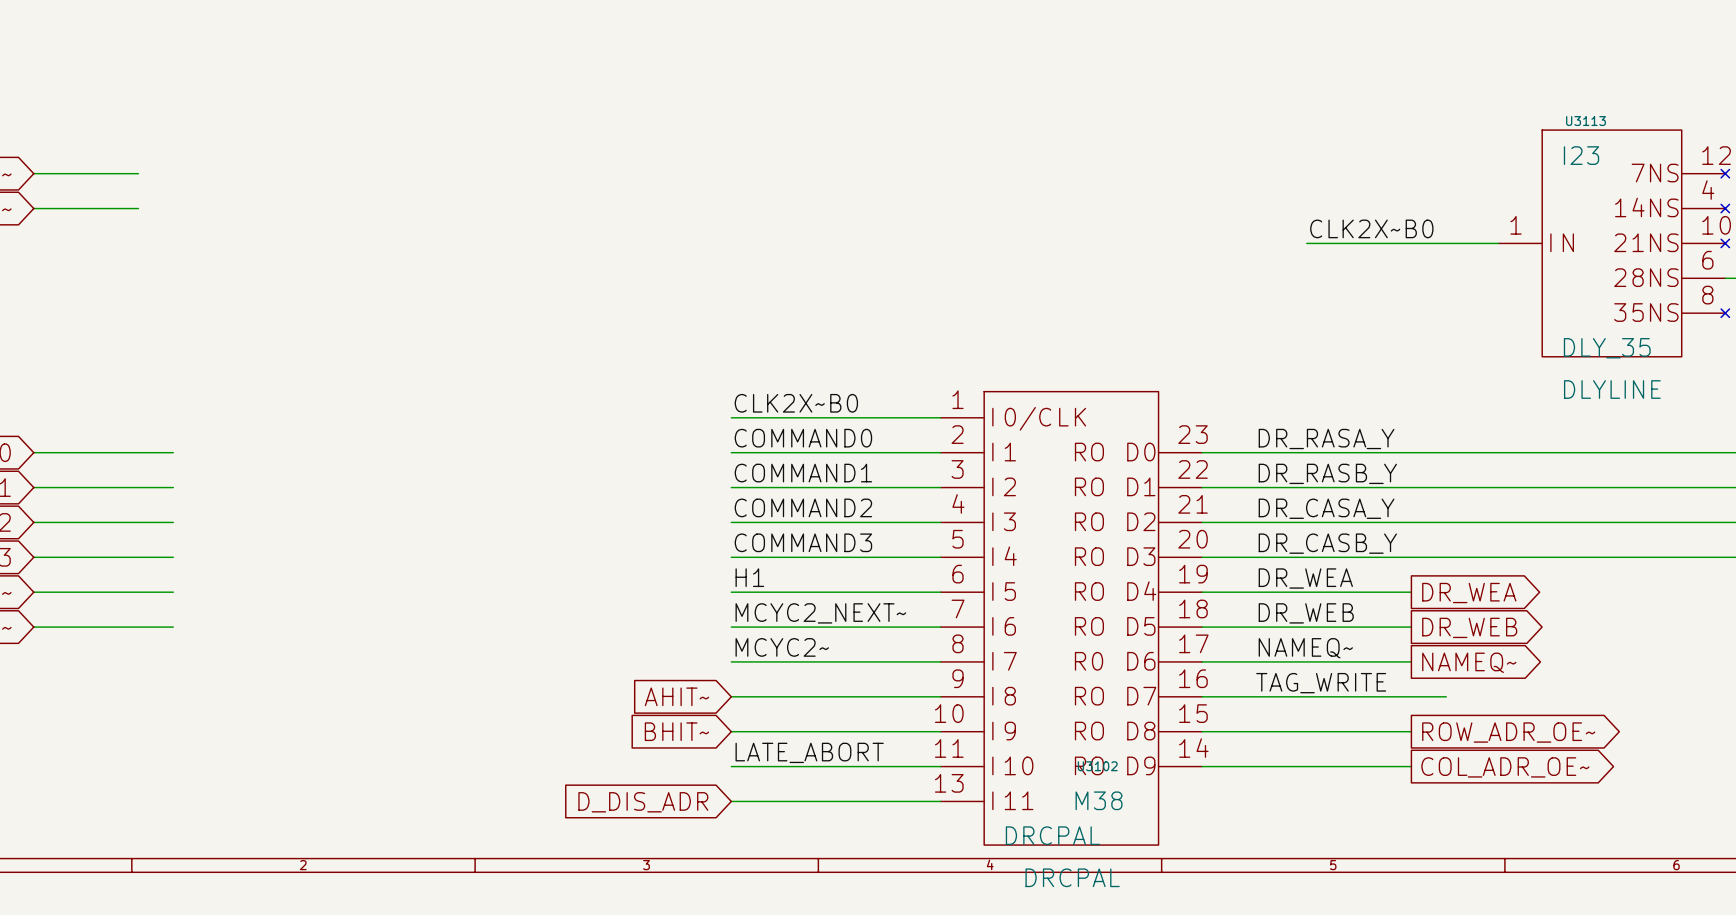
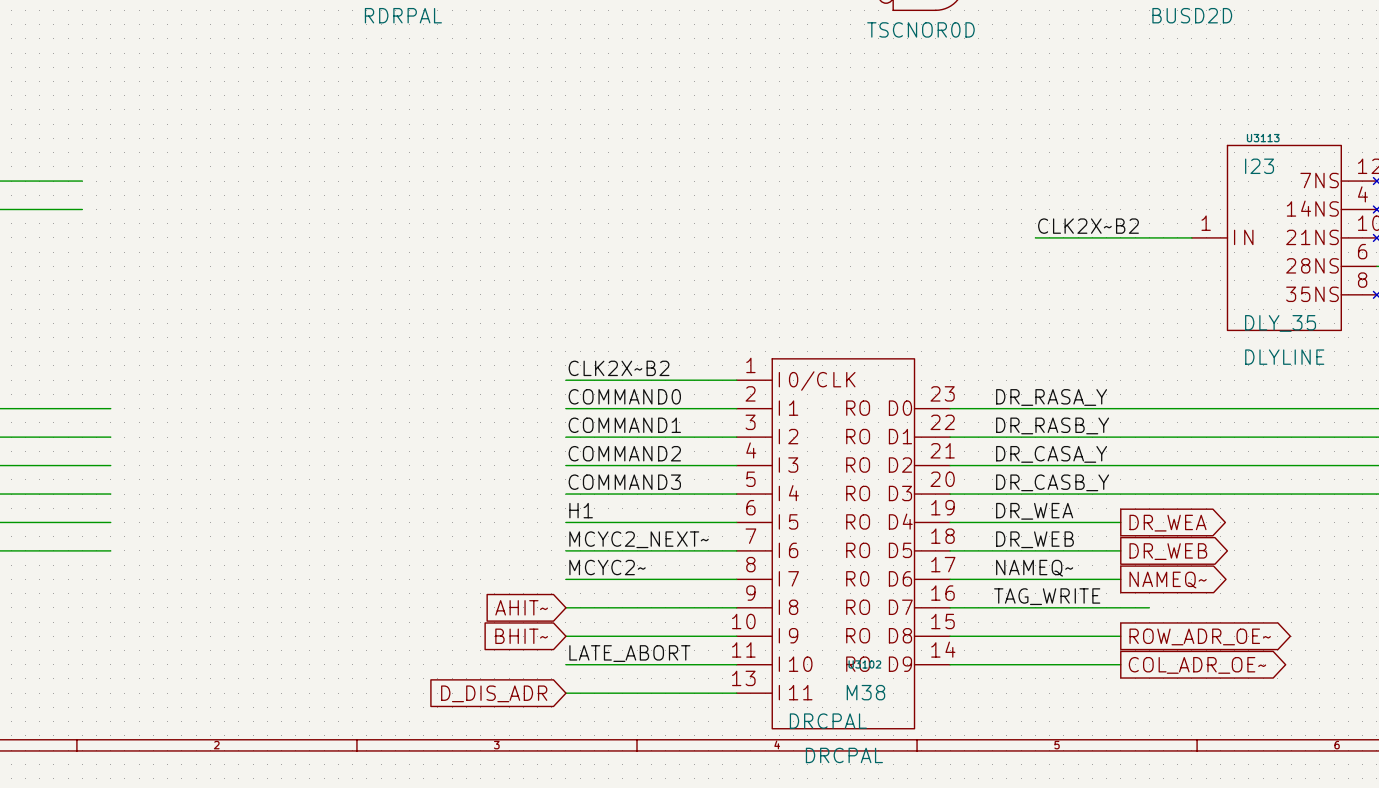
label: CLK2X~B0 (1371, 228) -> CLK2X~B2 (1088, 226)
label: CLK2X~B0 (796, 403) -> CLK2X~B2 (619, 368)

